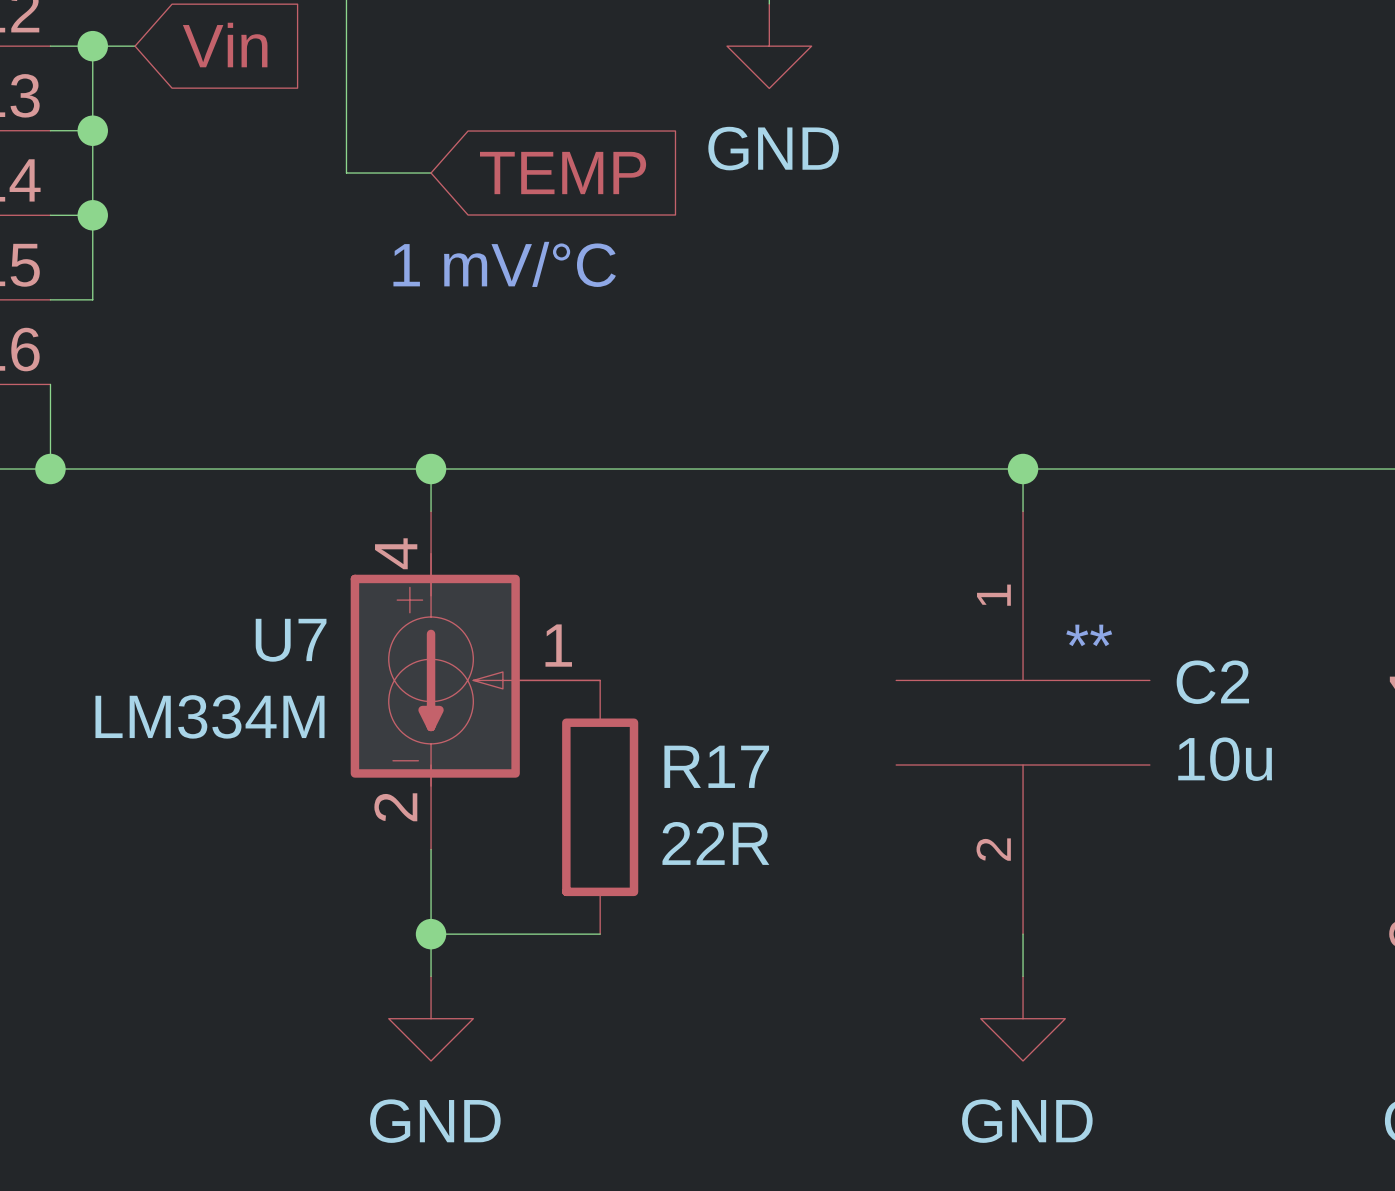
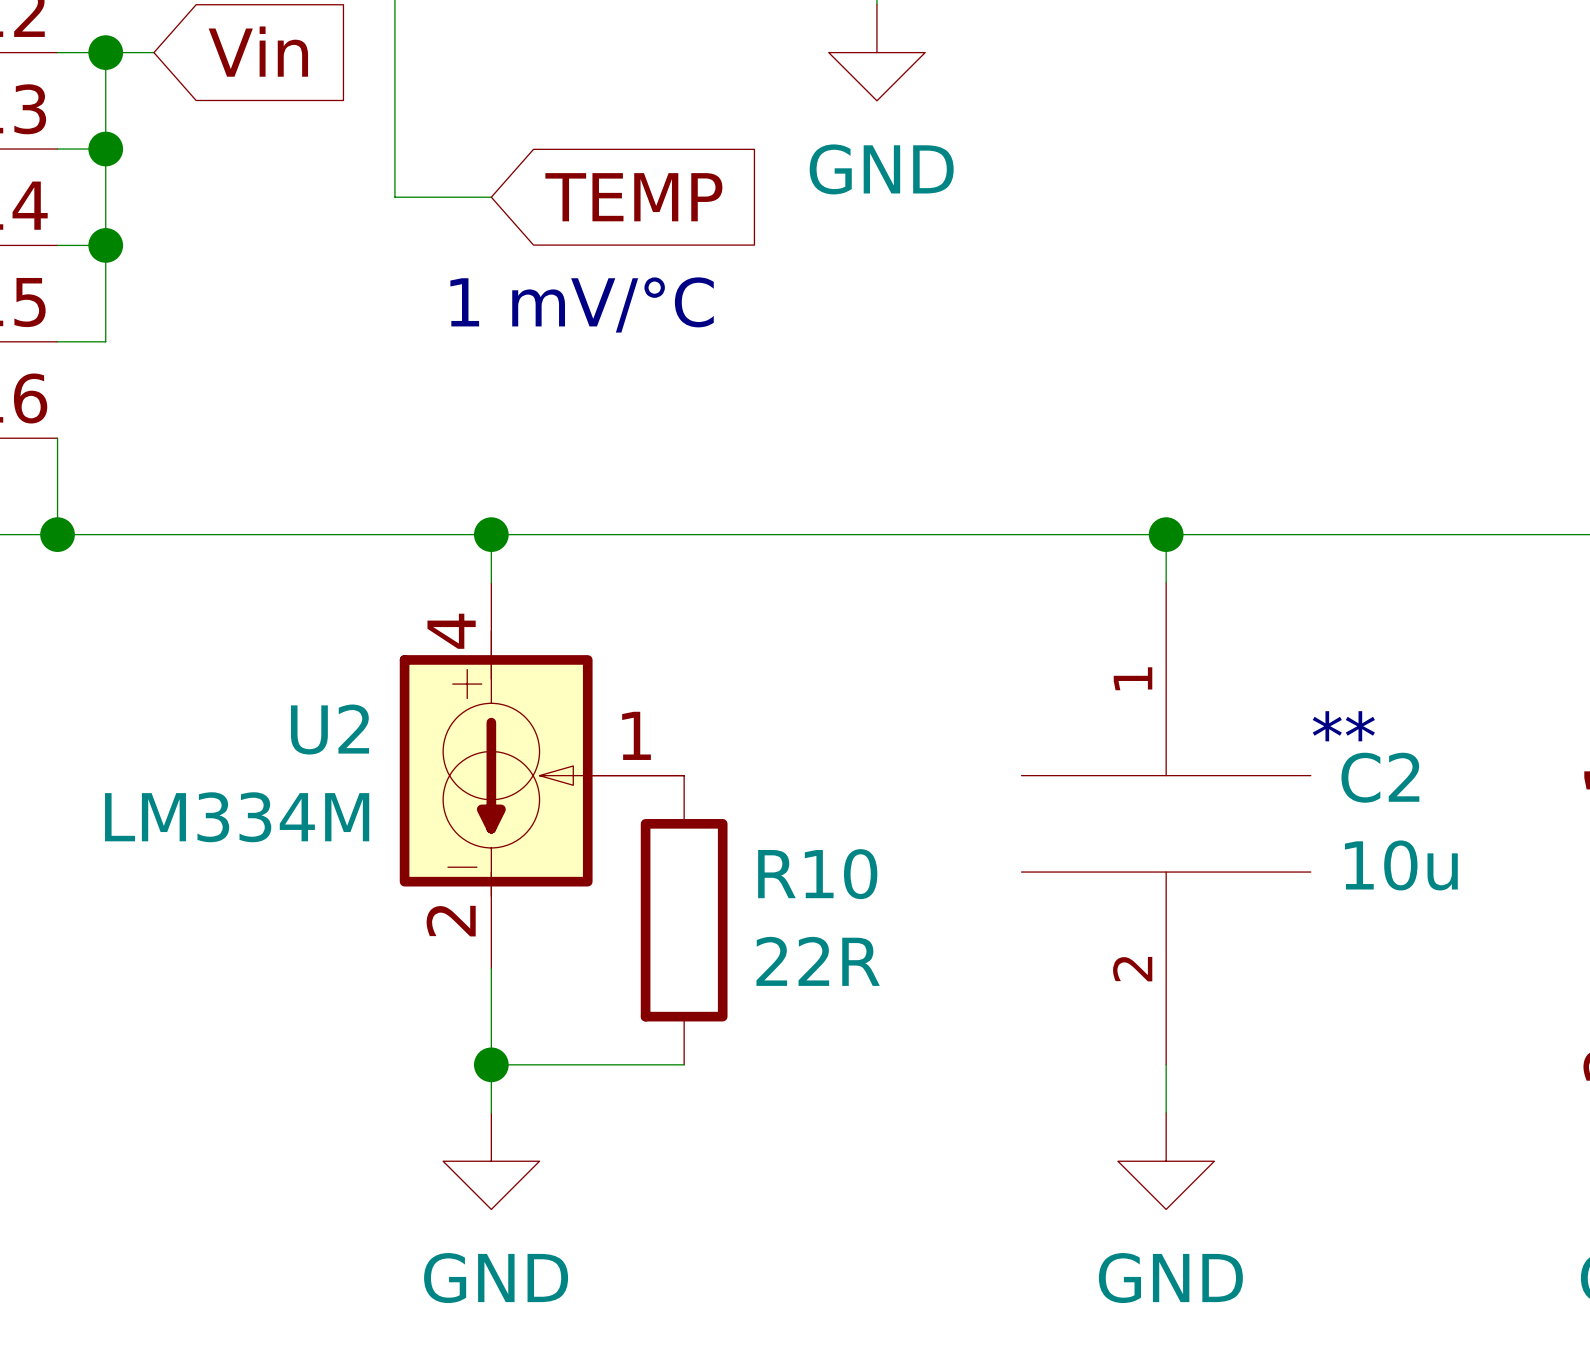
text position: ** (1089, 635) -> ** (1343, 726)
U7 name: U7 (291, 640) -> U2 (330, 729)
R17 name: R17 (716, 766) -> R10 (817, 874)

